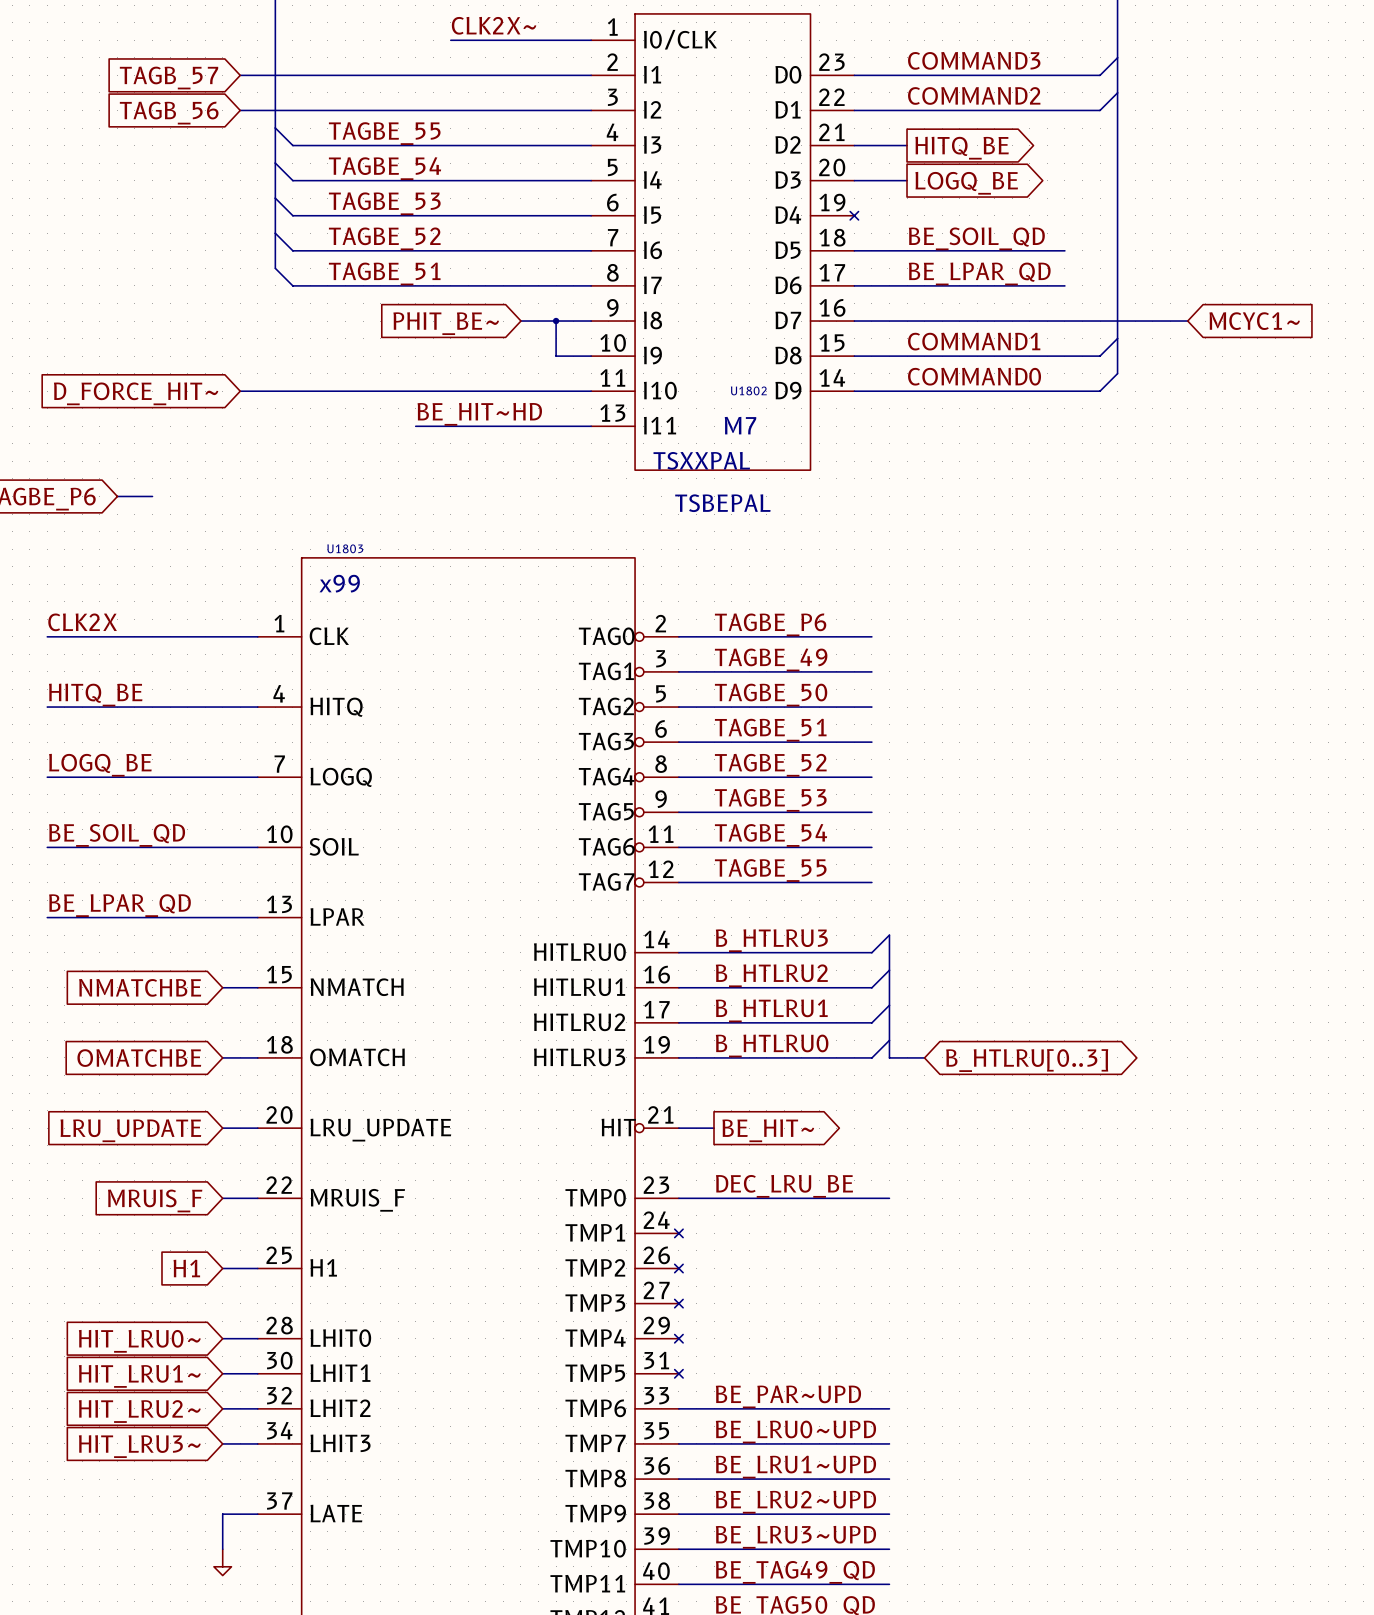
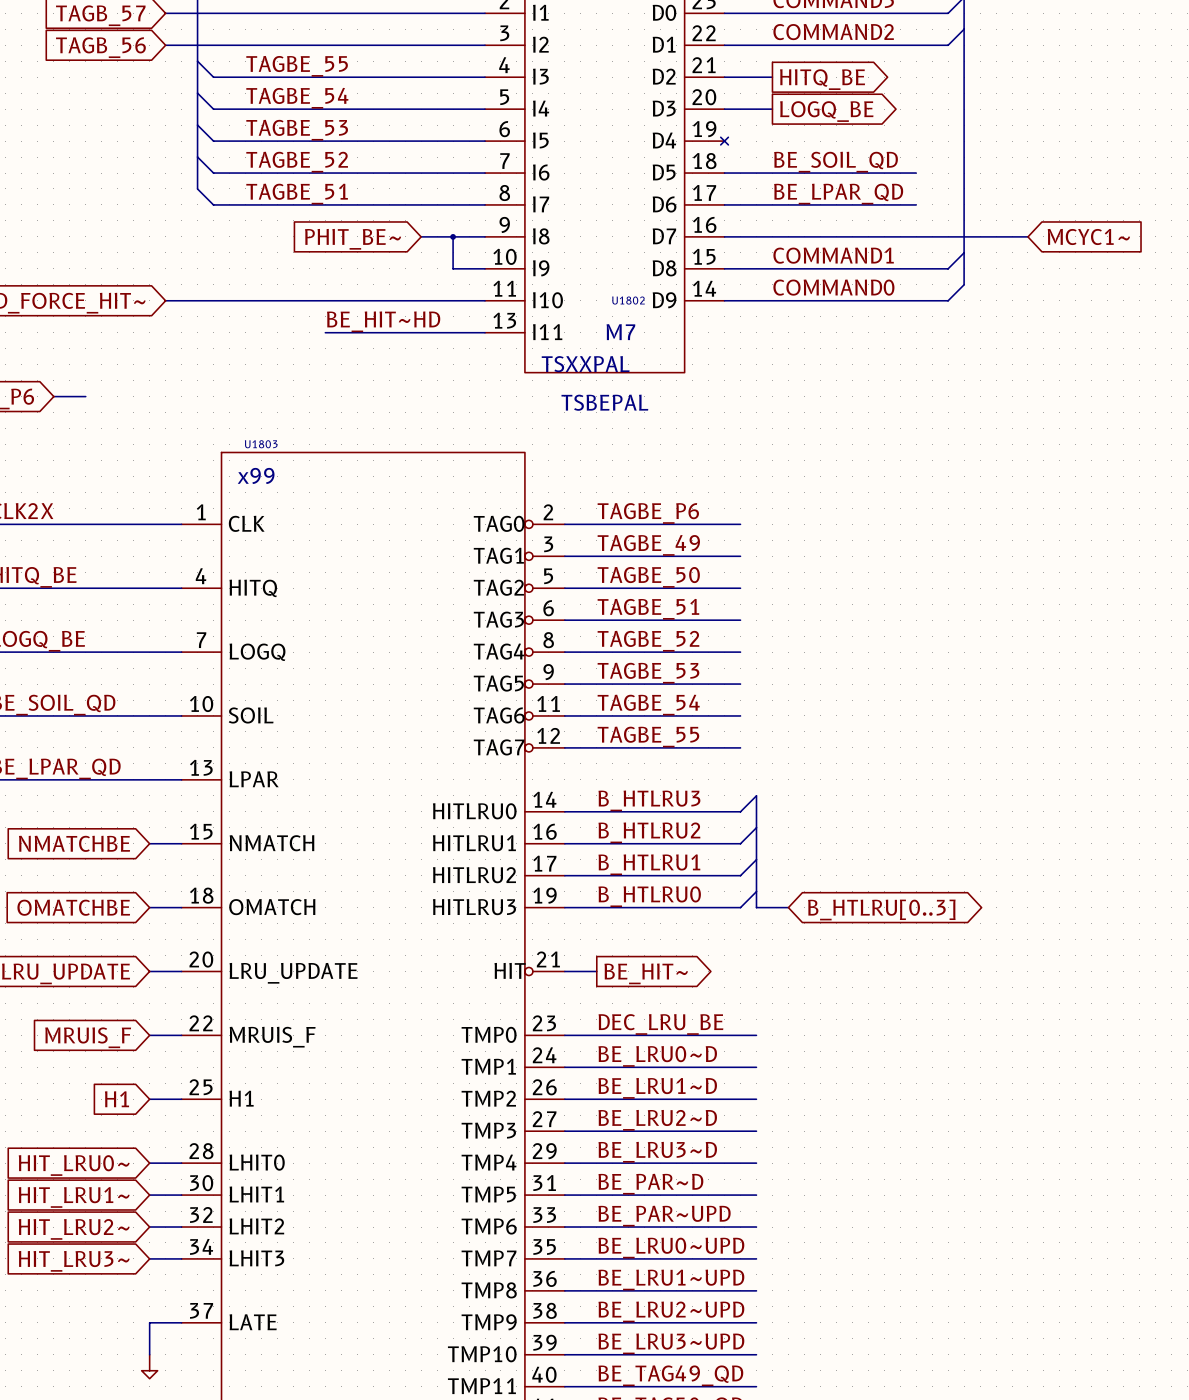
label: none -> BE_LRU0~D (657, 1056)
wire: none -> (564, 1067) (756, 1067)
no-connect mark: (678, 1233) -> none
label: none -> BE_LRU1~D (657, 1088)
wire: none -> (564, 1099) (756, 1099)
no-connect mark: (678, 1268) -> none
label: none -> BE_LRU2~D (657, 1120)
wire: none -> (564, 1131) (756, 1131)
no-connect mark: (678, 1303) -> none
label: none -> BE_LRU3~D (657, 1152)
wire: none -> (564, 1163) (756, 1163)
no-connect mark: (678, 1338) -> none
label: none -> BE_PAR~D (650, 1184)
wire: none -> (564, 1195) (756, 1195)
no-connect mark: (678, 1373) -> none

